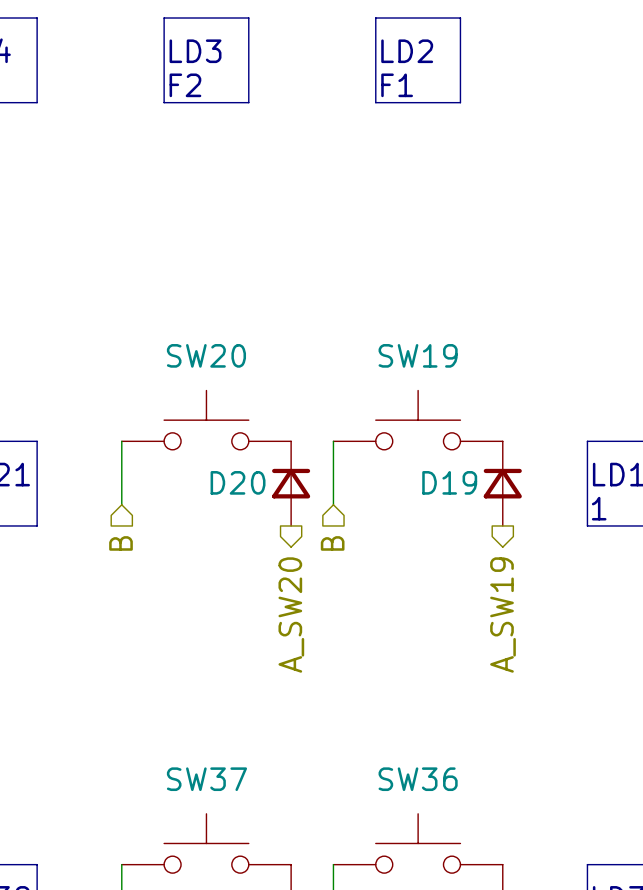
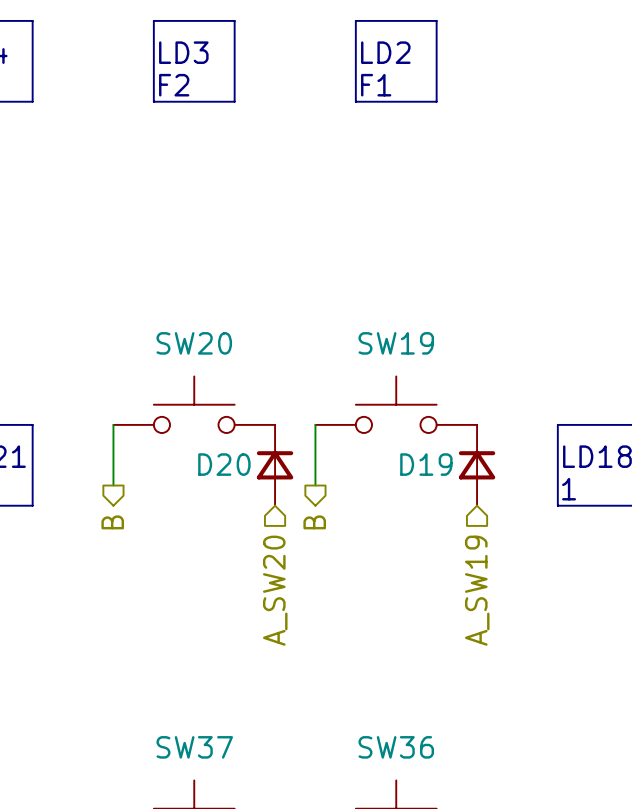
hierarchical label shape: input (120, 543) -> output (112, 522)
hierarchical label shape: input (332, 543) -> output (314, 522)
hierarchical label shape: output (291, 615) -> input (275, 590)
hierarchical label shape: output (502, 615) -> input (477, 590)

